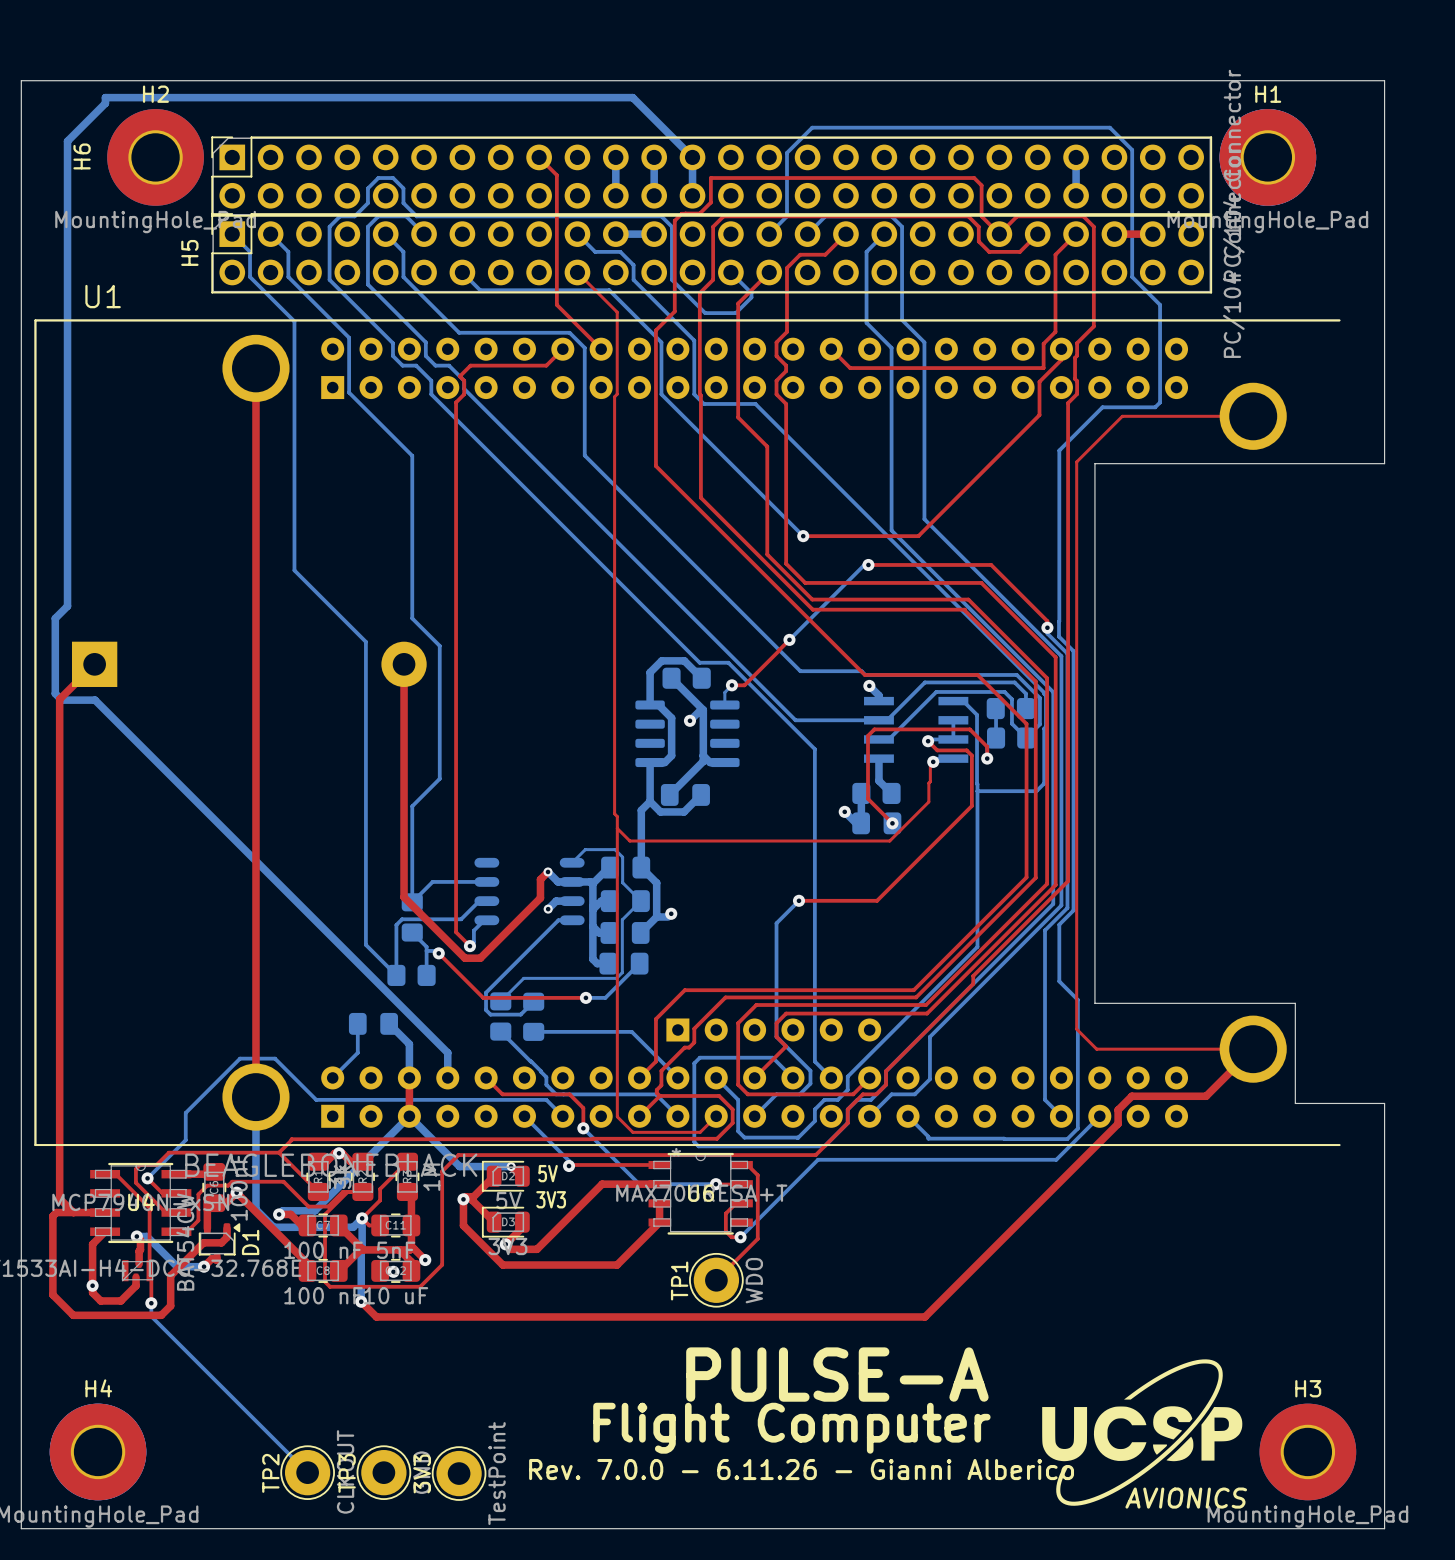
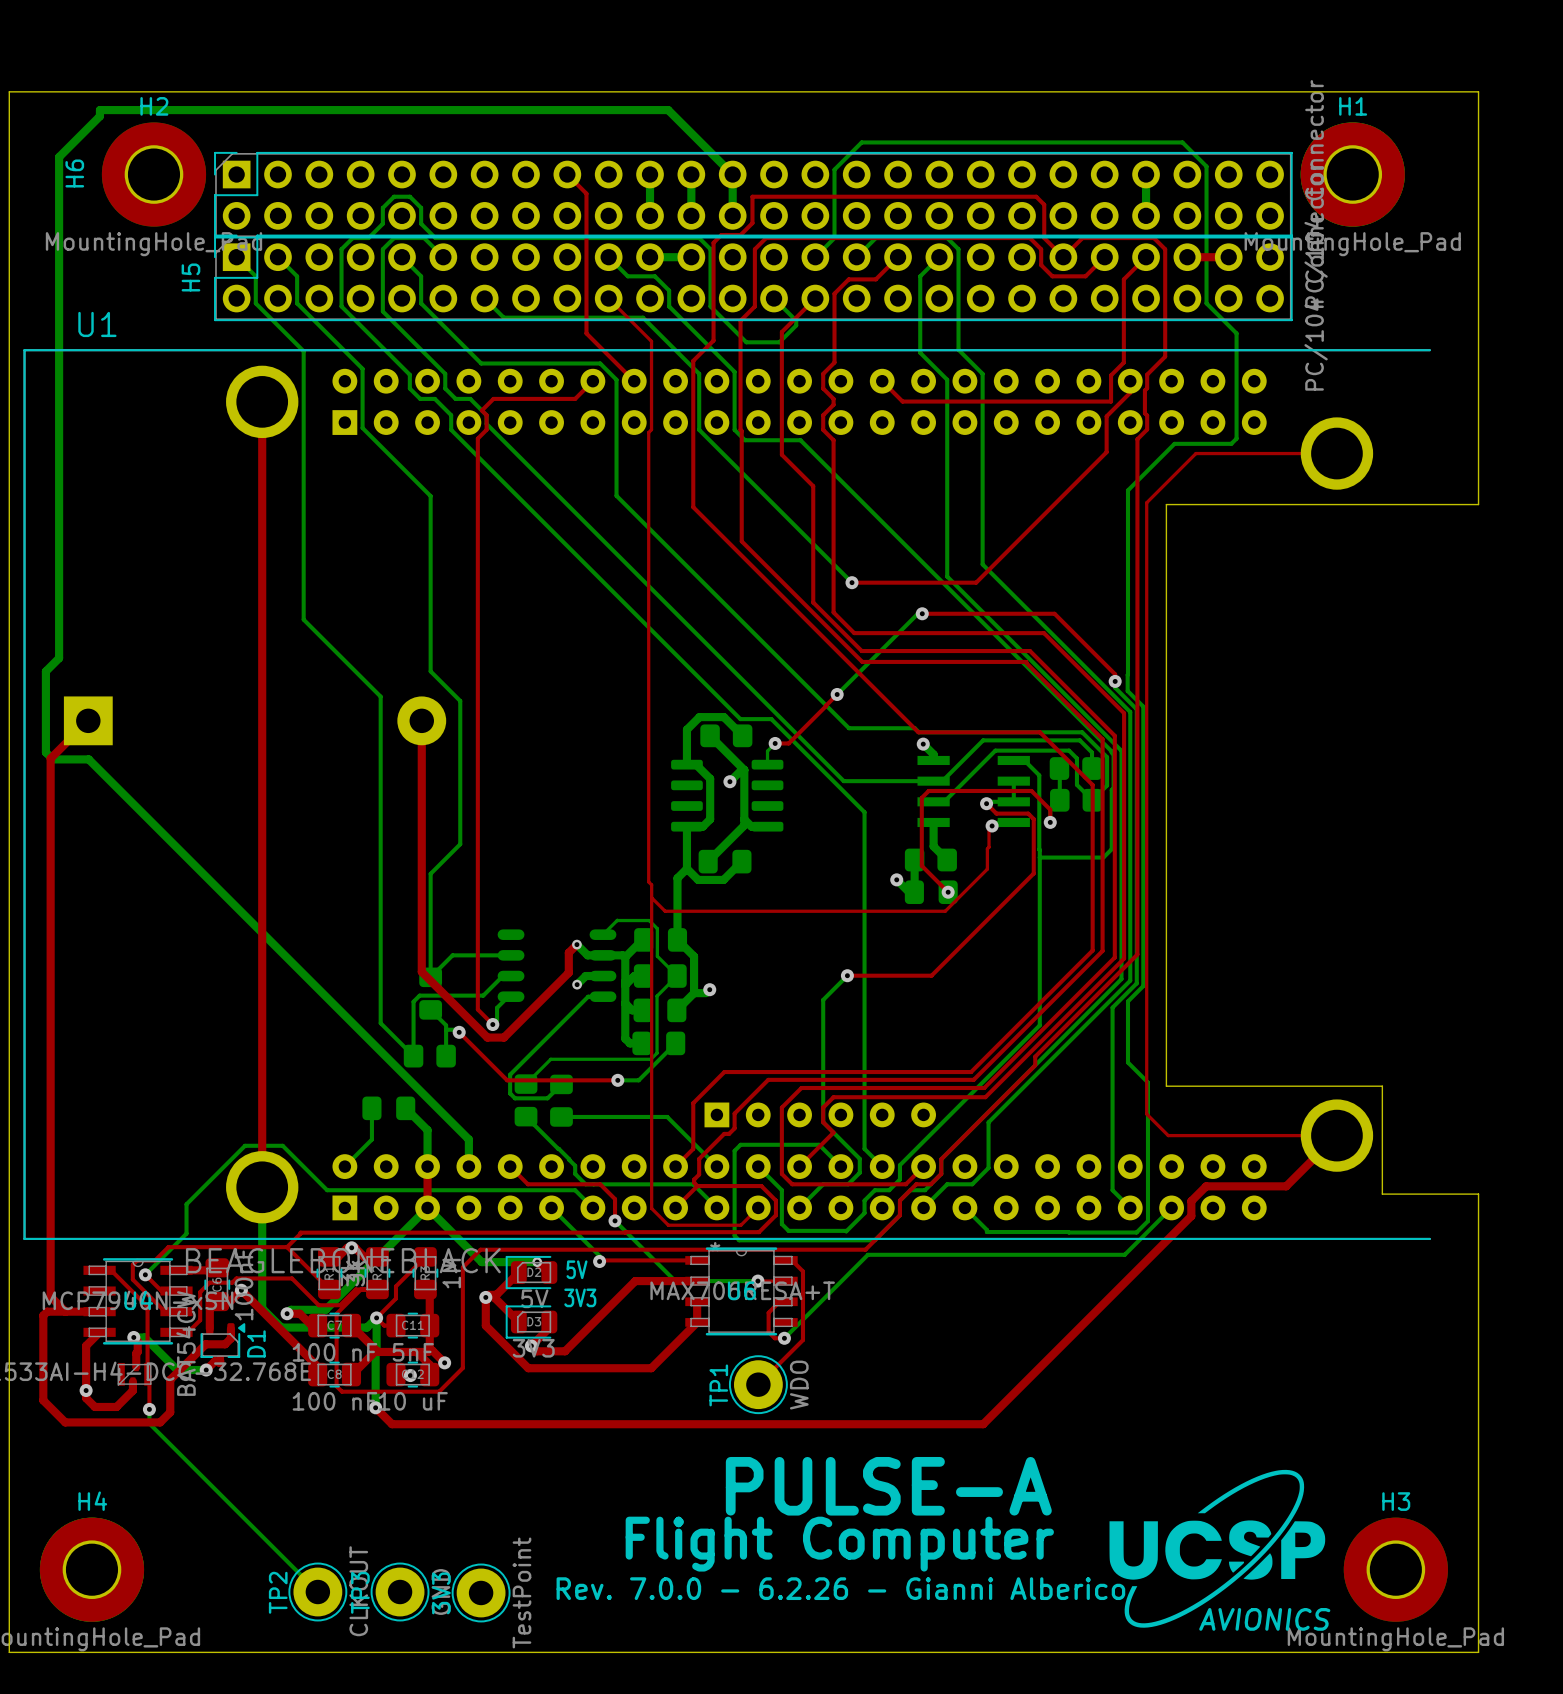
text: Rev. 7.0.0 - 6.11.26 - Gianni Alberico (801, 1469) -> Rev. 7.0.0 - 6.2.26 - Gianni Alberico (840, 1588)

